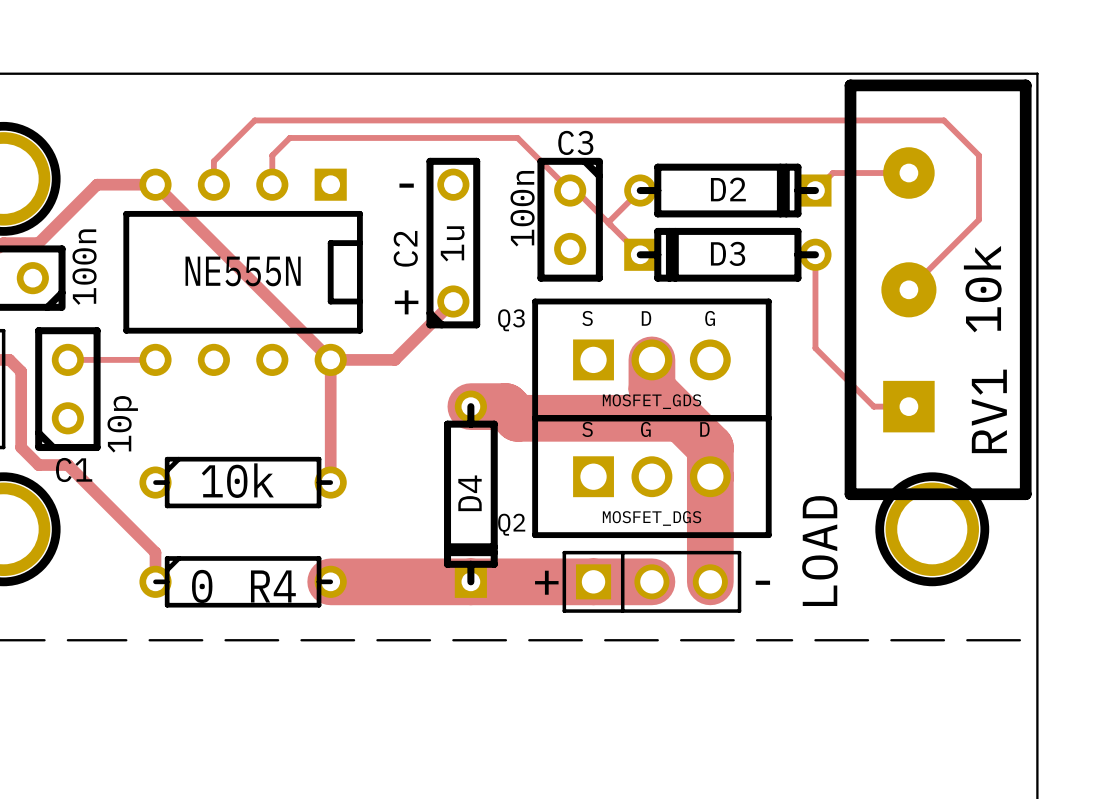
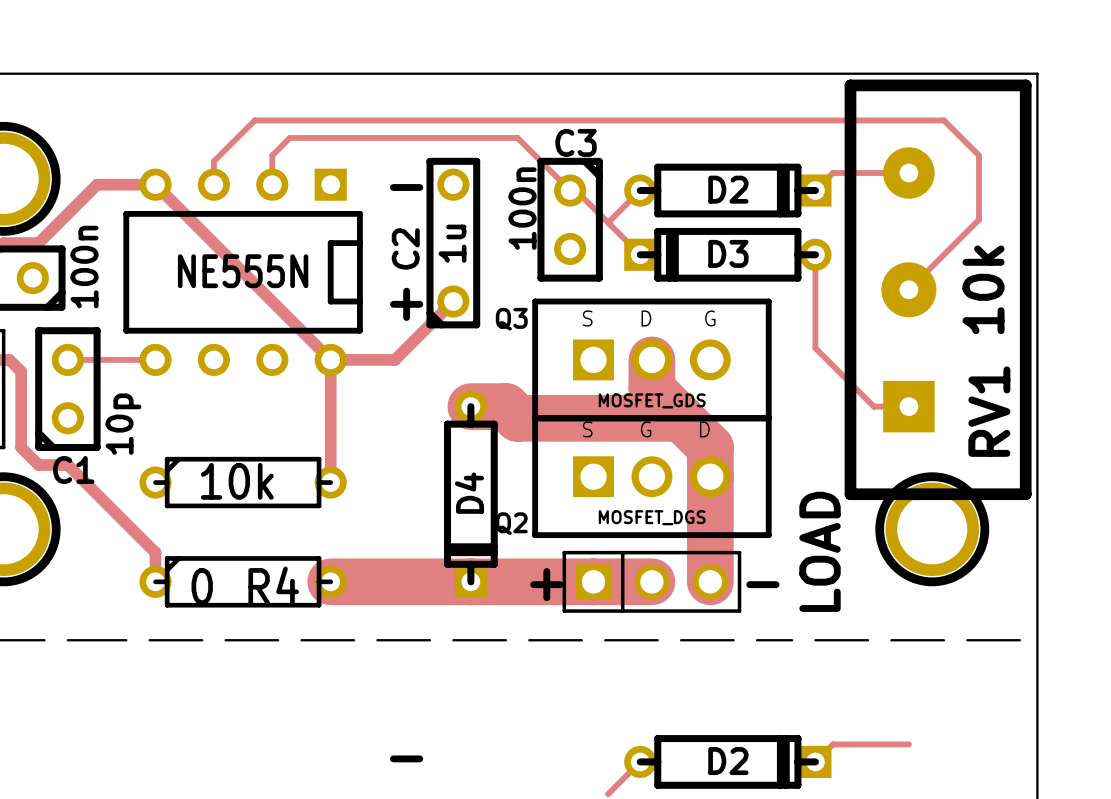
track: none -> (908, 744) (832, 744) (815, 761)
text: none -> - (406, 758)
track: none -> (640, 761) (608, 794)
D2: none -> (727, 761)

